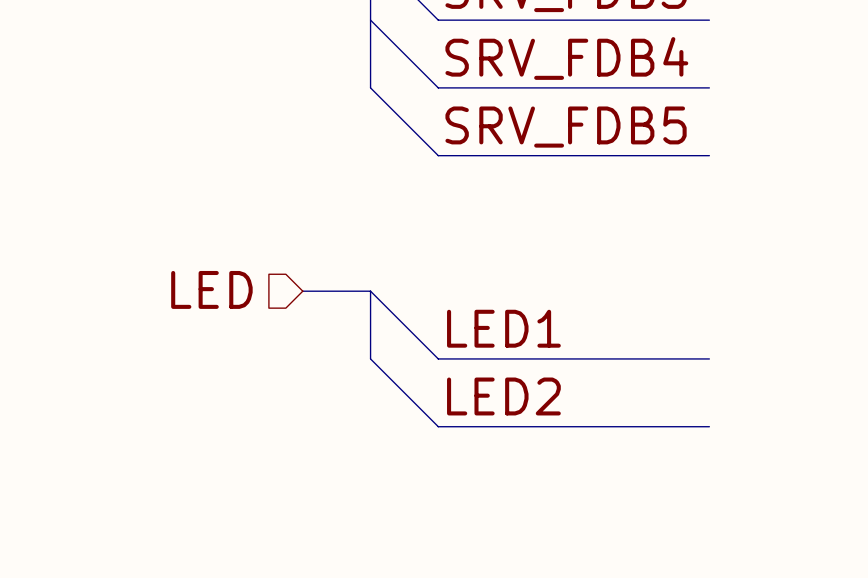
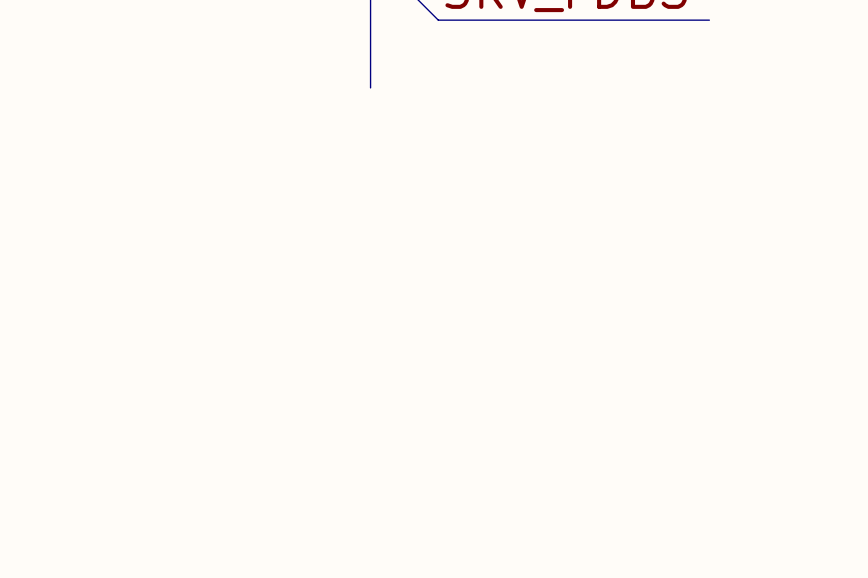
wire: (370, 20) (438, 87) (709, 87) -> none
label: SRV_FDB4 (566, 58) -> none
wire: (370, 87) (438, 155) (709, 155) -> none
label: SRV_FDB5 (566, 127) -> none
hierarchical label: LED (211, 289) -> none
bus: (302, 291) (370, 291) (370, 358) -> none
wire: (370, 291) (438, 358) (709, 358) -> none
label: LED1 (503, 328) -> none
wire: (370, 358) (438, 426) (709, 426) -> none
label: LED2 (503, 396) -> none

